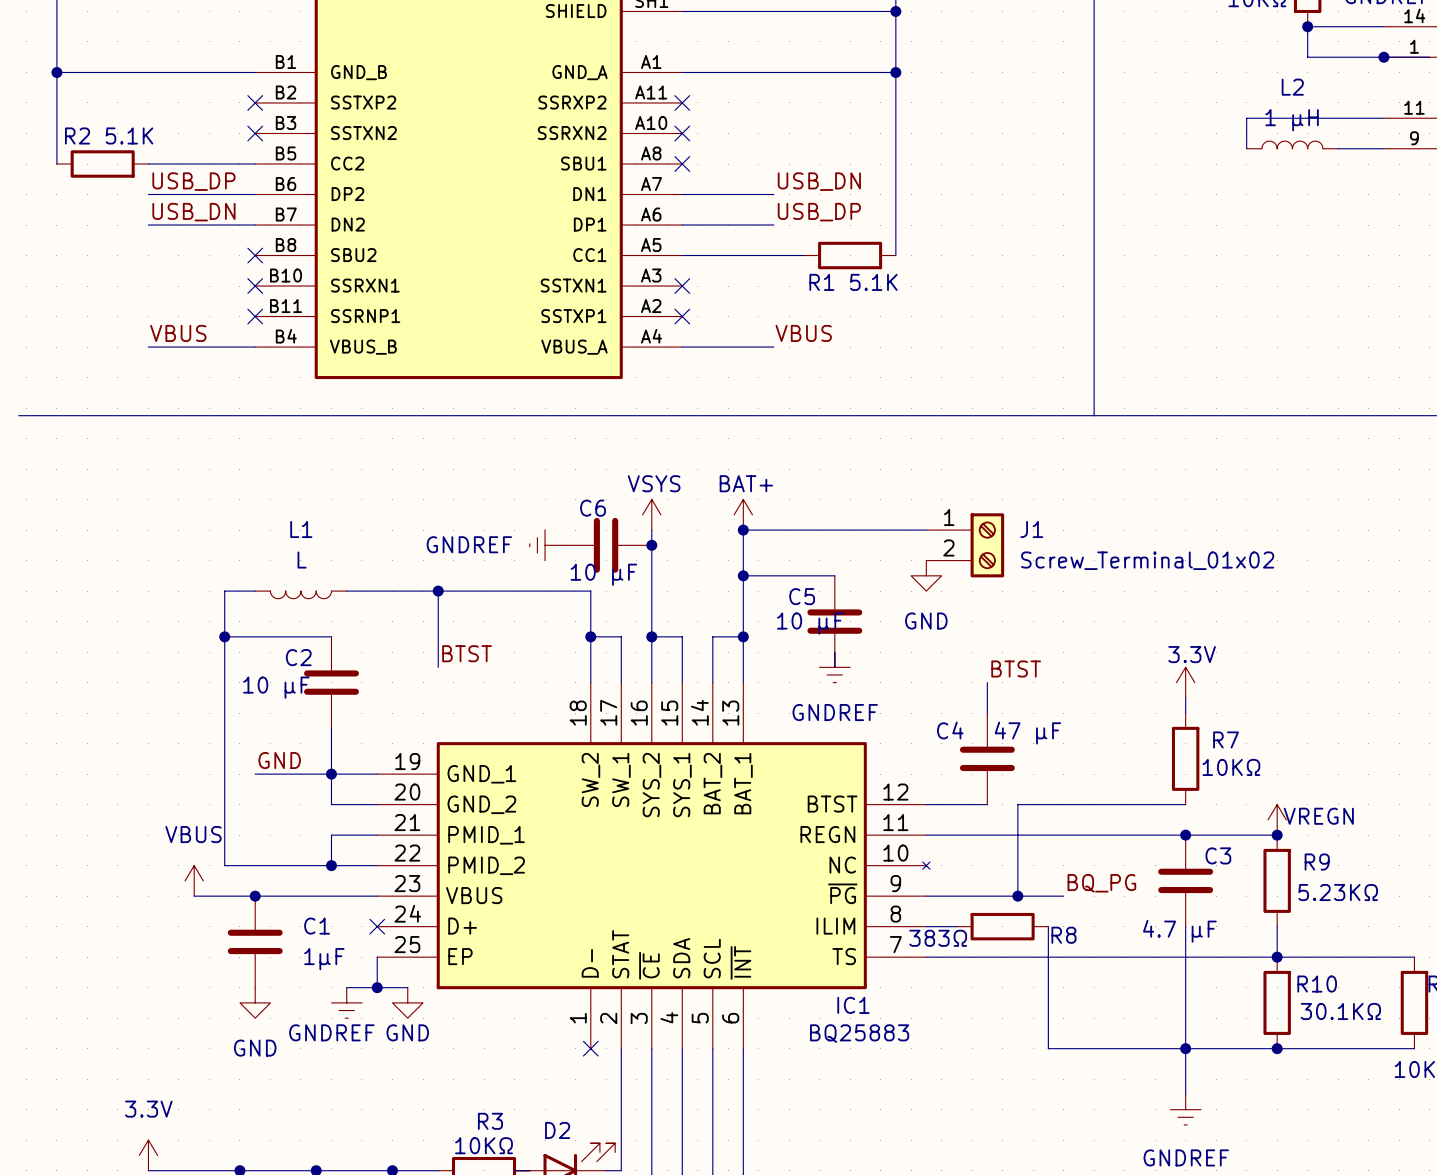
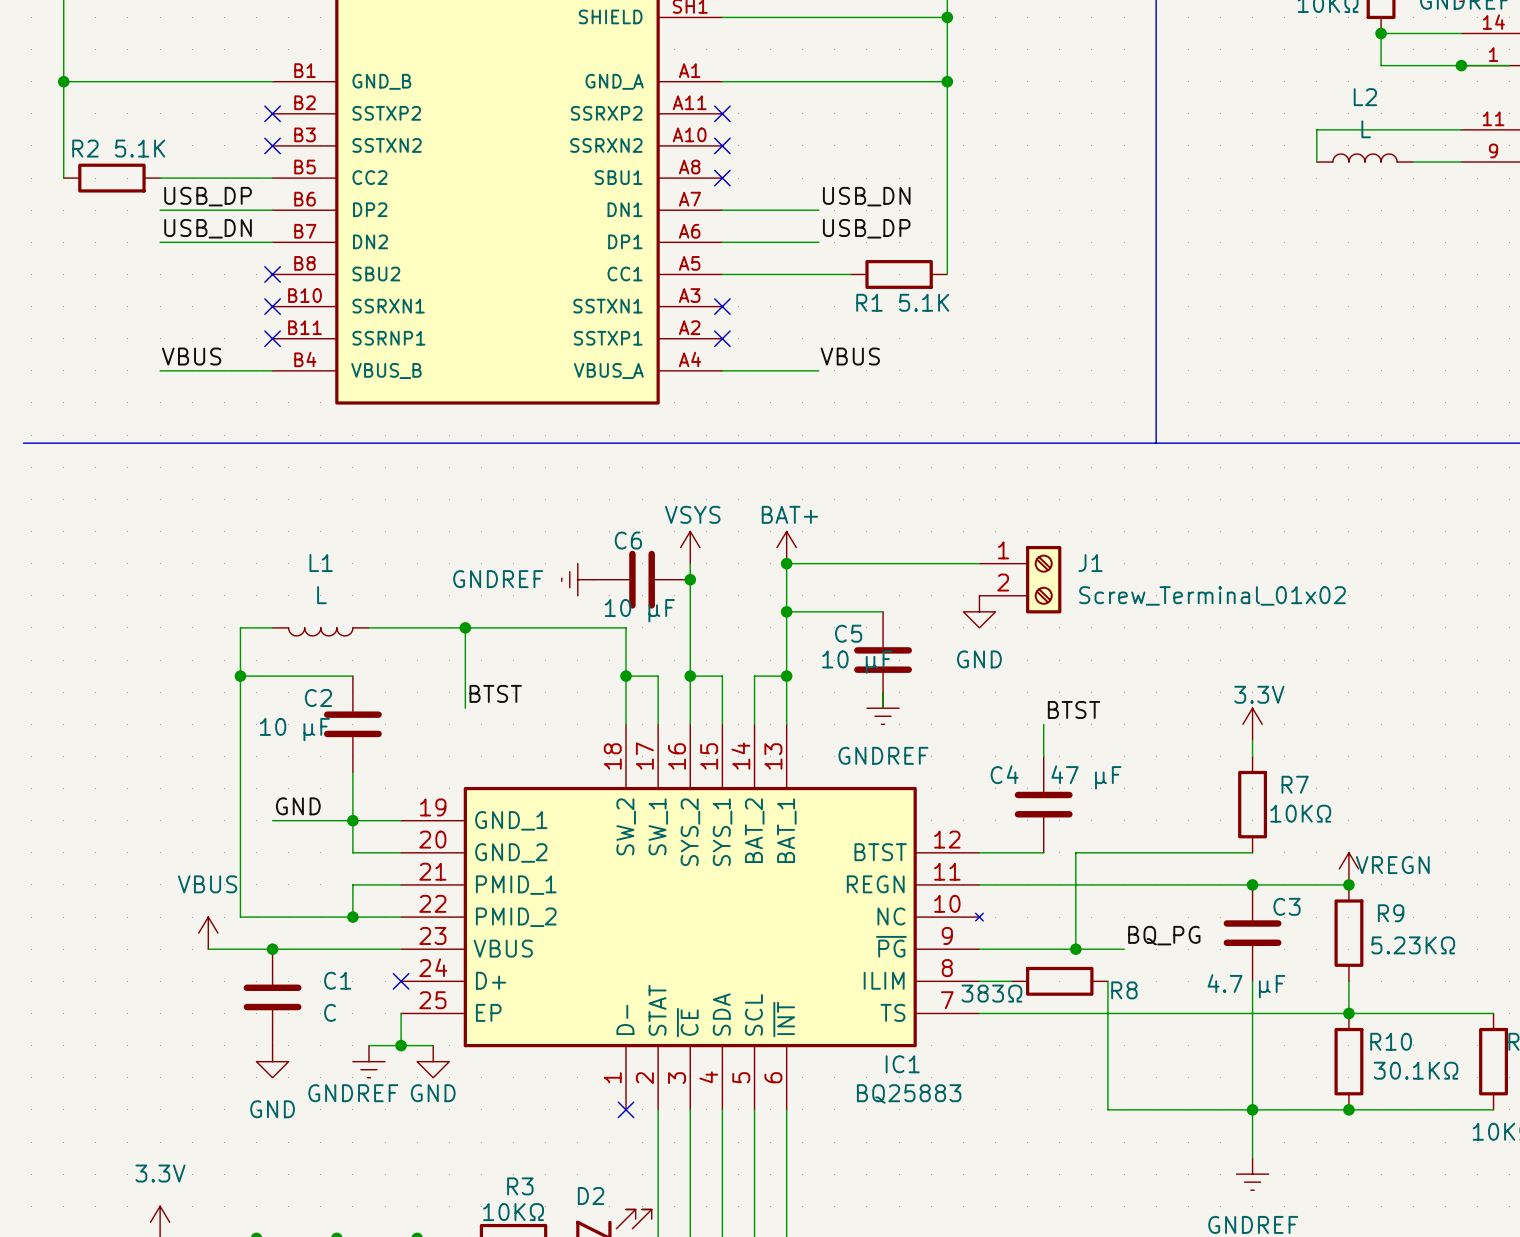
L2 value: 1 μH (1292, 120) -> L (1366, 129)
C1 value: 1μF (324, 959) -> C (330, 1012)

